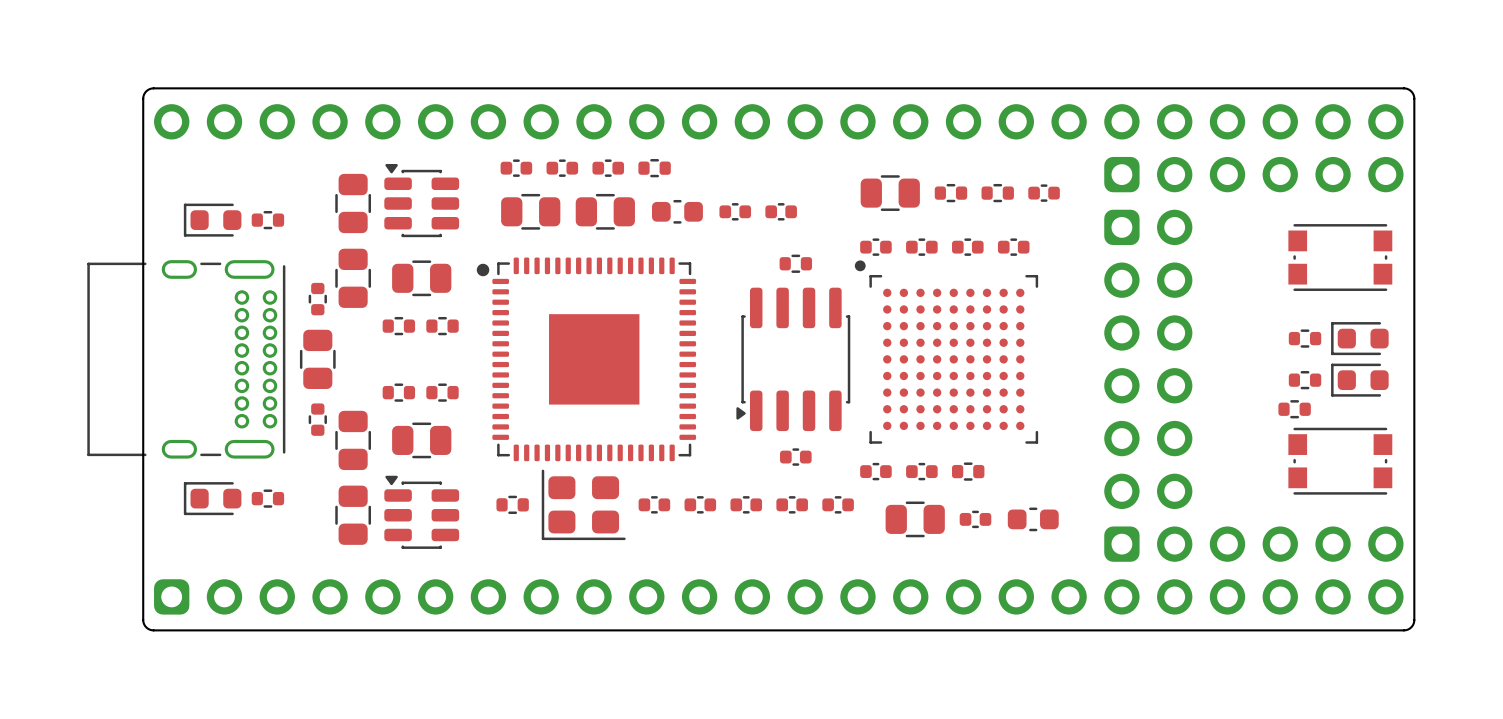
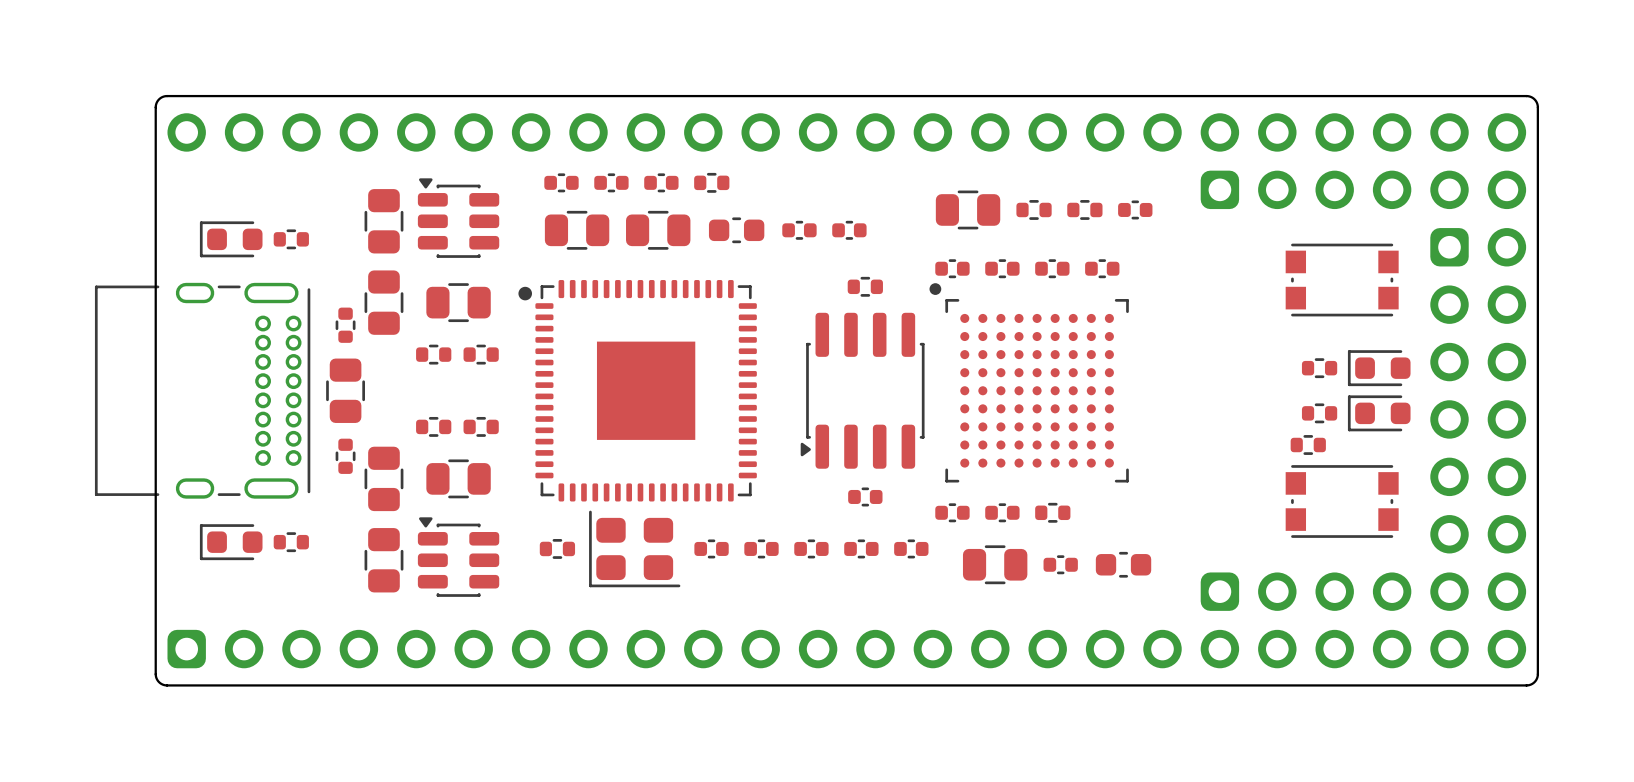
part position: (1340, 257) -> (1342, 280)
part: none -> (1319, 368)
part: none -> (1379, 368)
part: (1305, 338) -> none
part: (1359, 338) -> none
part position: (1148, 359) -> (1478, 390)
part: none -> (1319, 413)
part: none -> (1379, 413)
part: (1305, 380) -> none
part: (1359, 380) -> none
part: none -> (1308, 444)
part: (1294, 409) -> none
part position: (1340, 461) -> (1342, 501)

